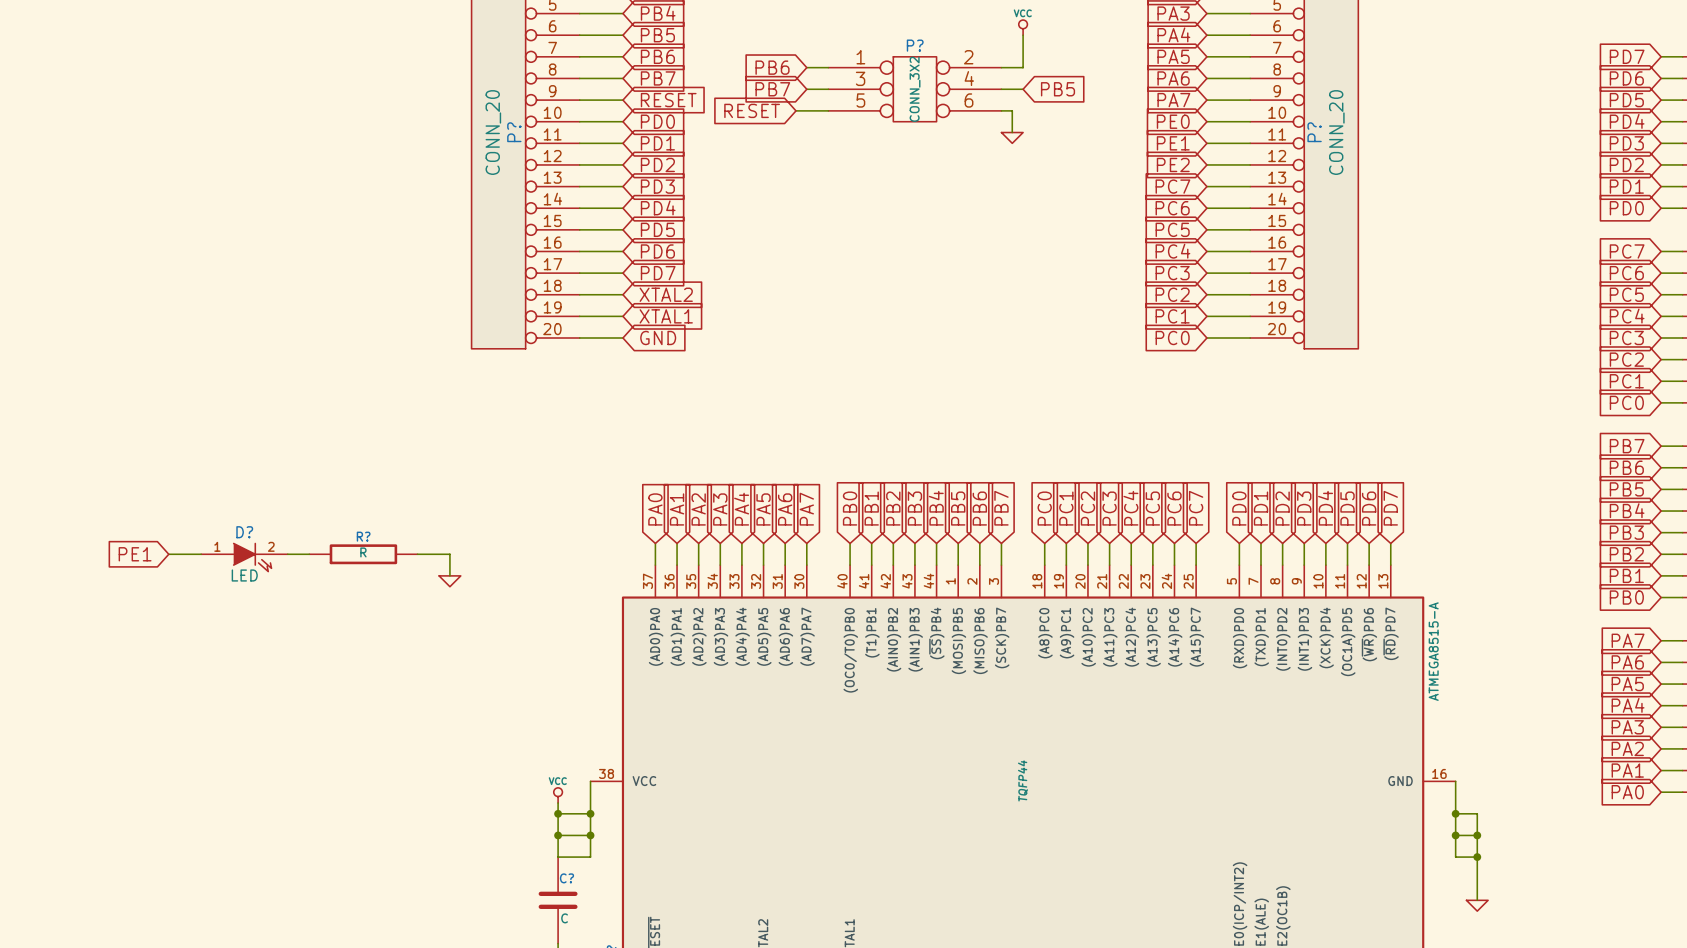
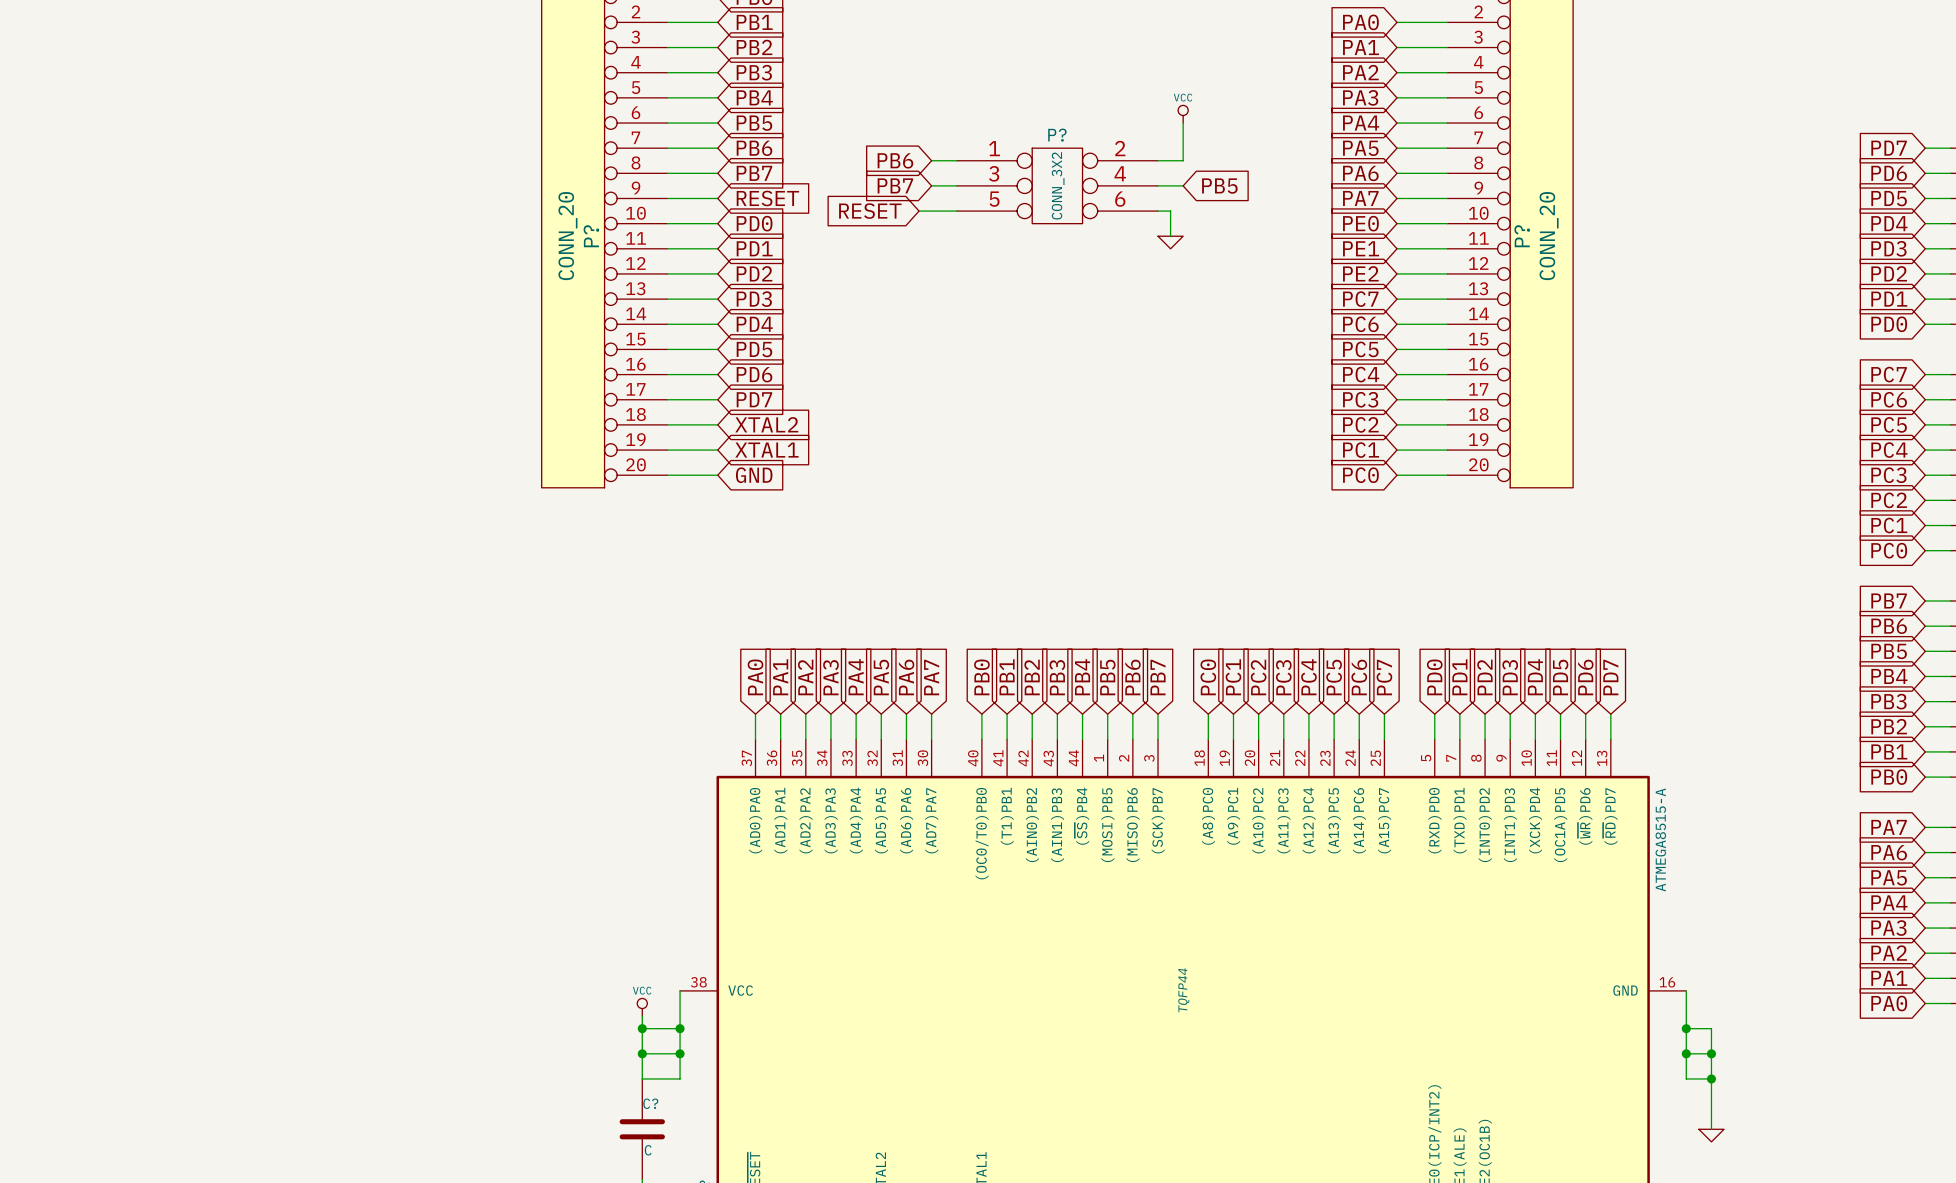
global label: PE1 (135, 554) -> none
wire: (168, 554) (201, 554) -> none
wire: (287, 554) (309, 554) -> none
R?: R (363, 554) -> none
wire: (417, 554) (449, 554) (449, 575) -> none
D?: LED (244, 557) -> none
power symbol: (449, 581) -> none

